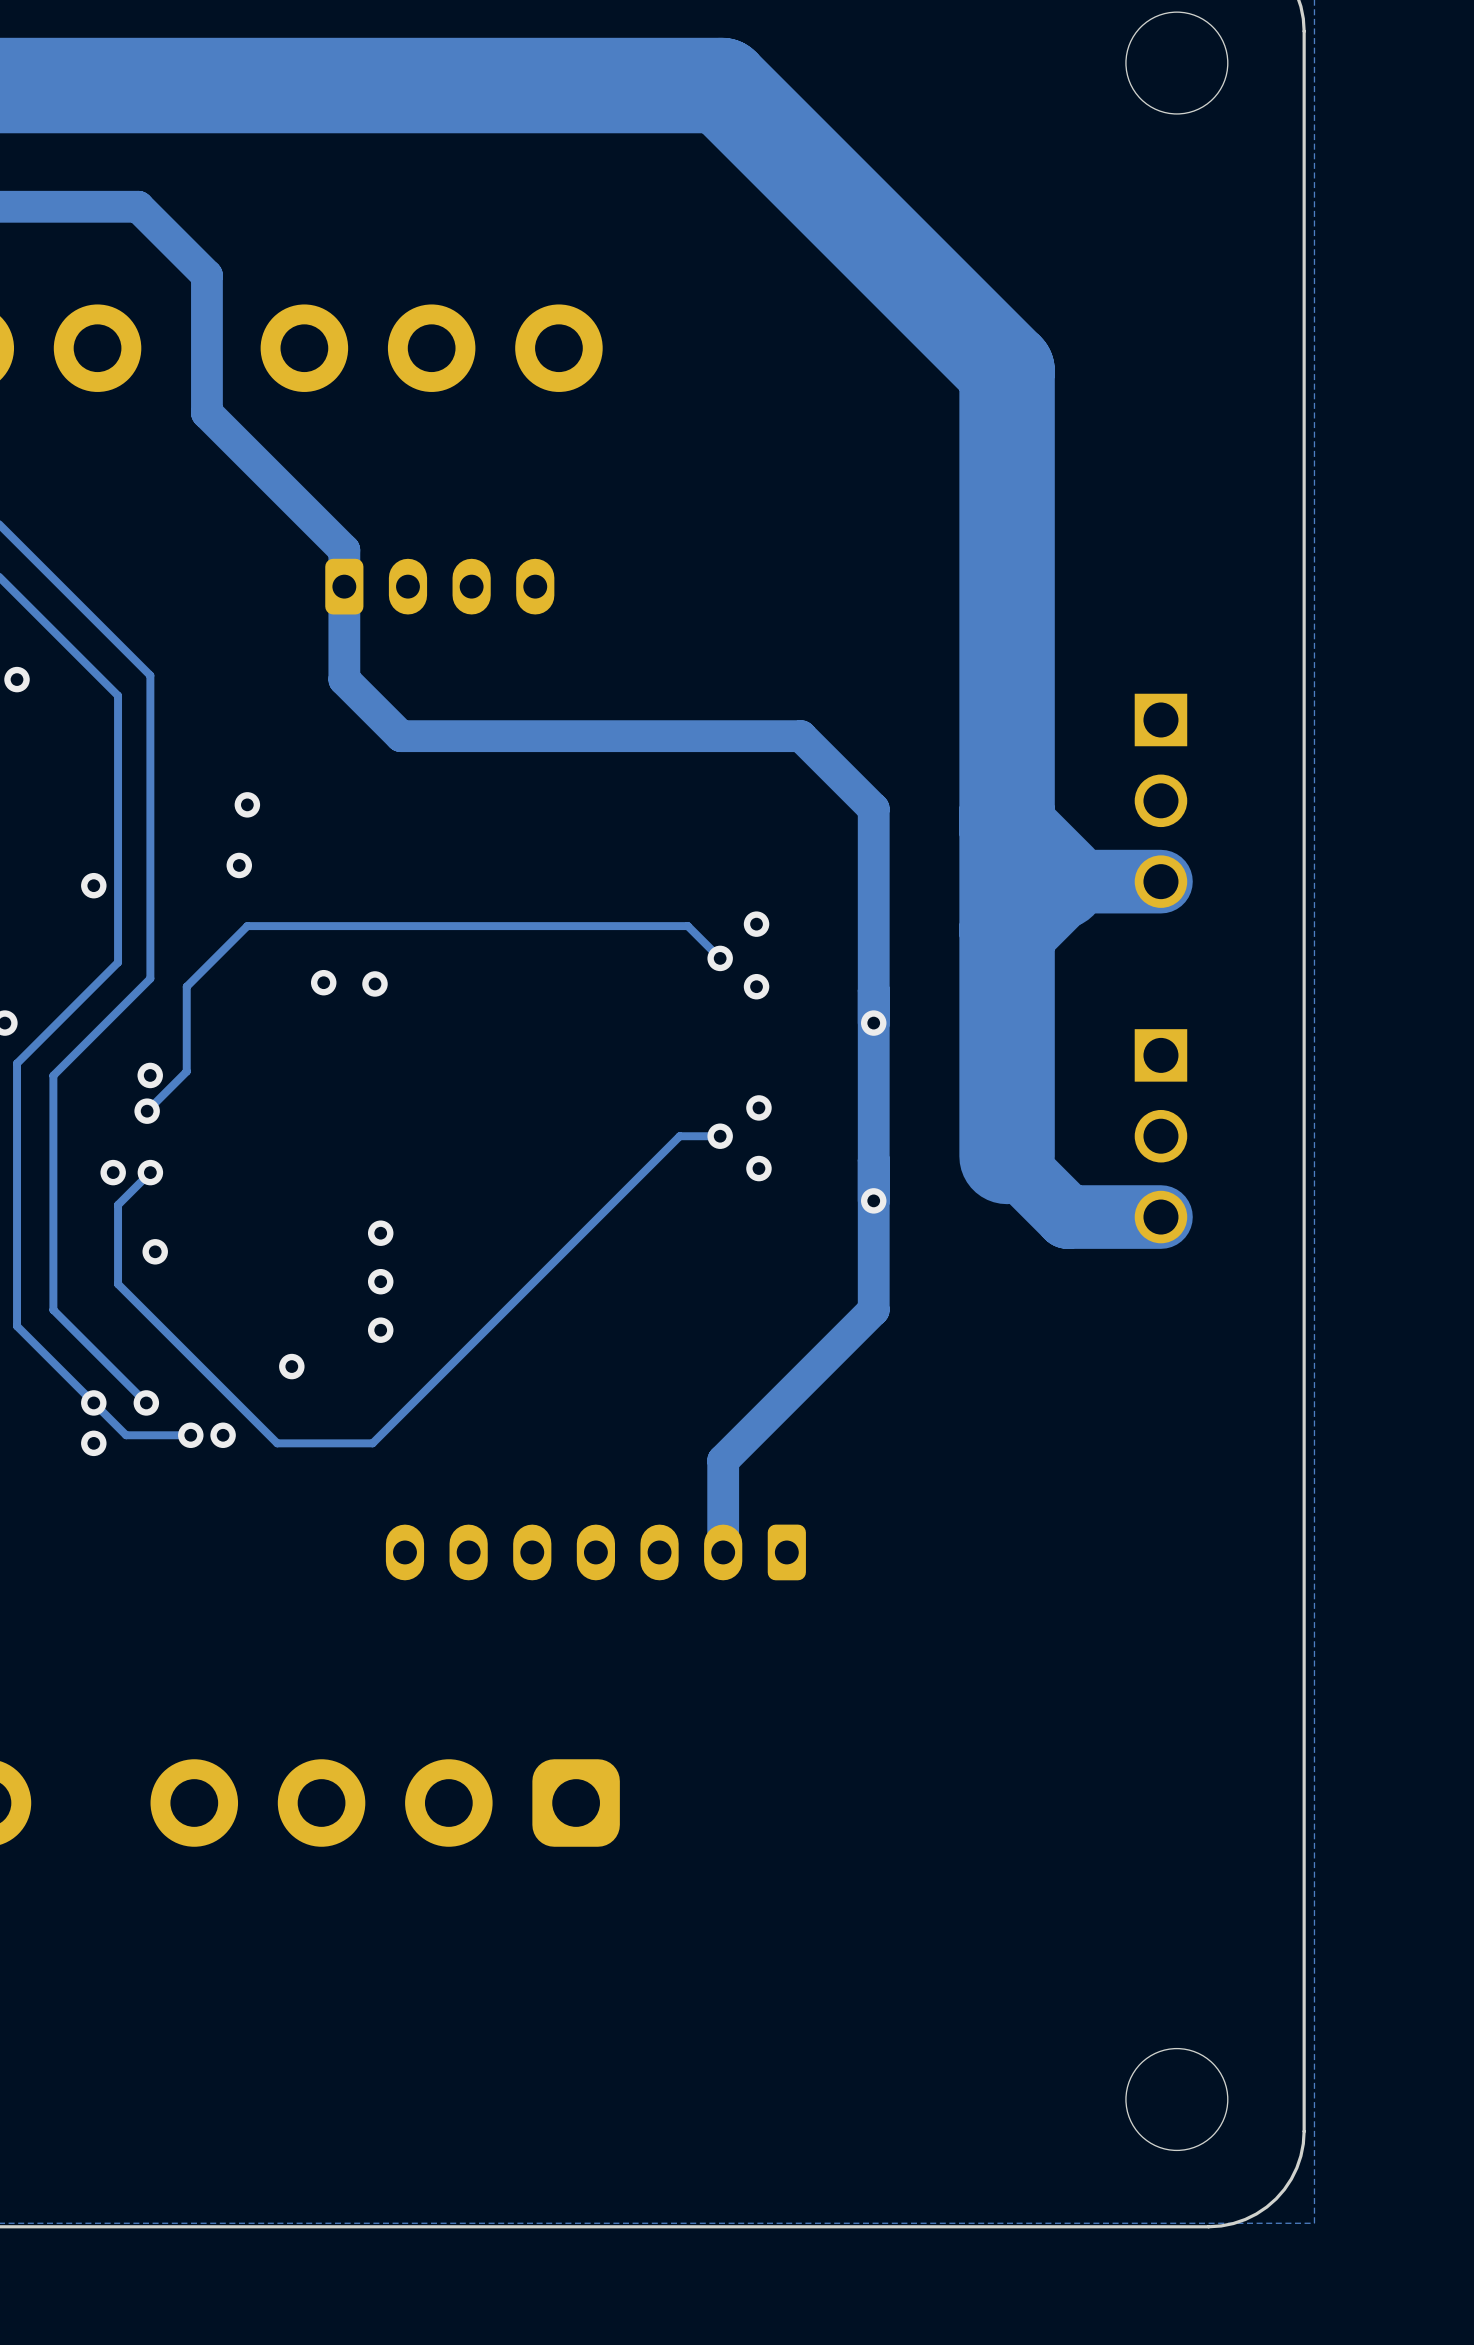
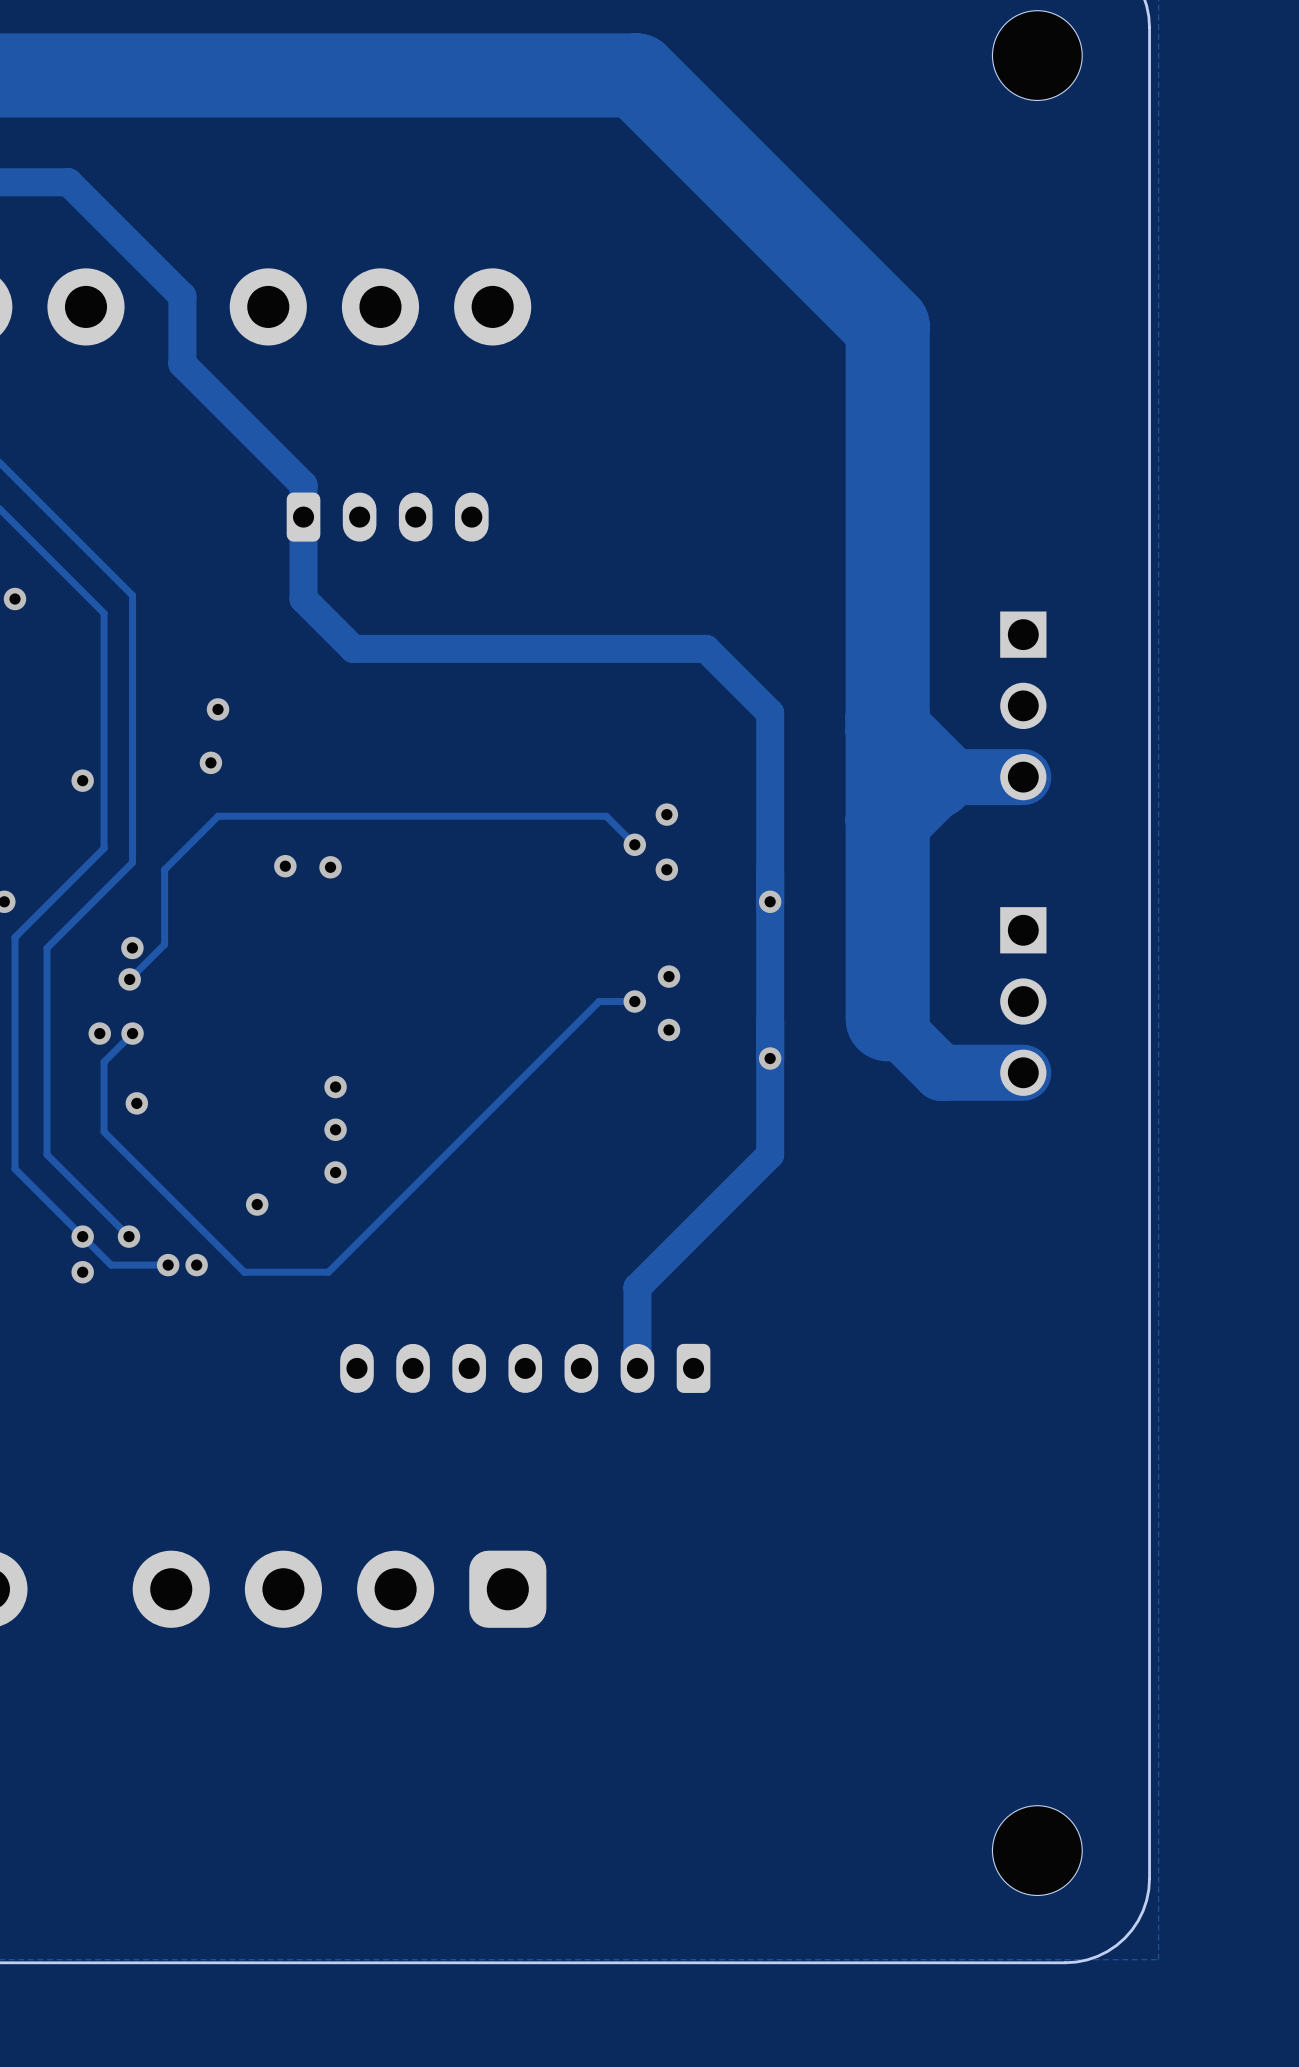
track: (77, 206) (138, 206) (206, 275) (206, 336) -> (68, 182) (182, 296)

